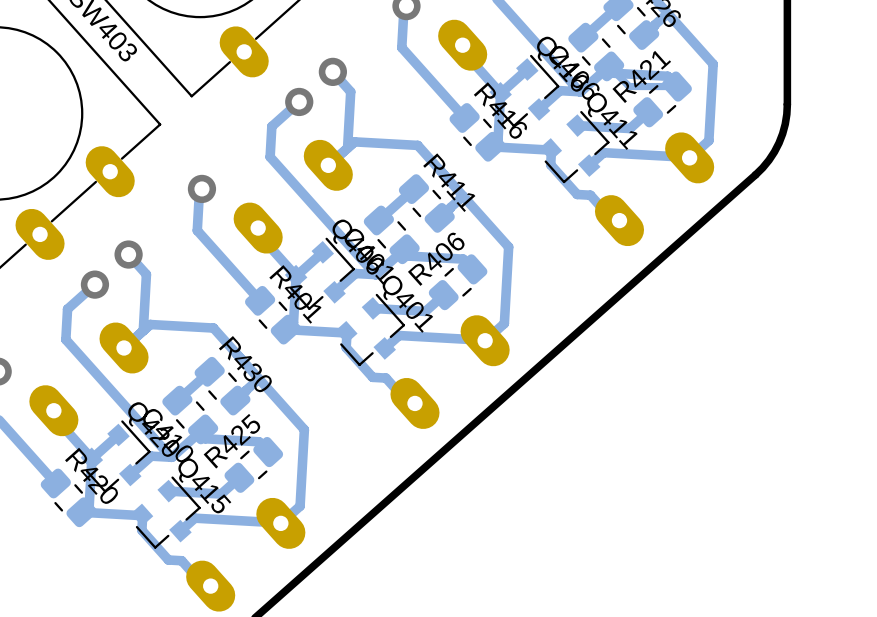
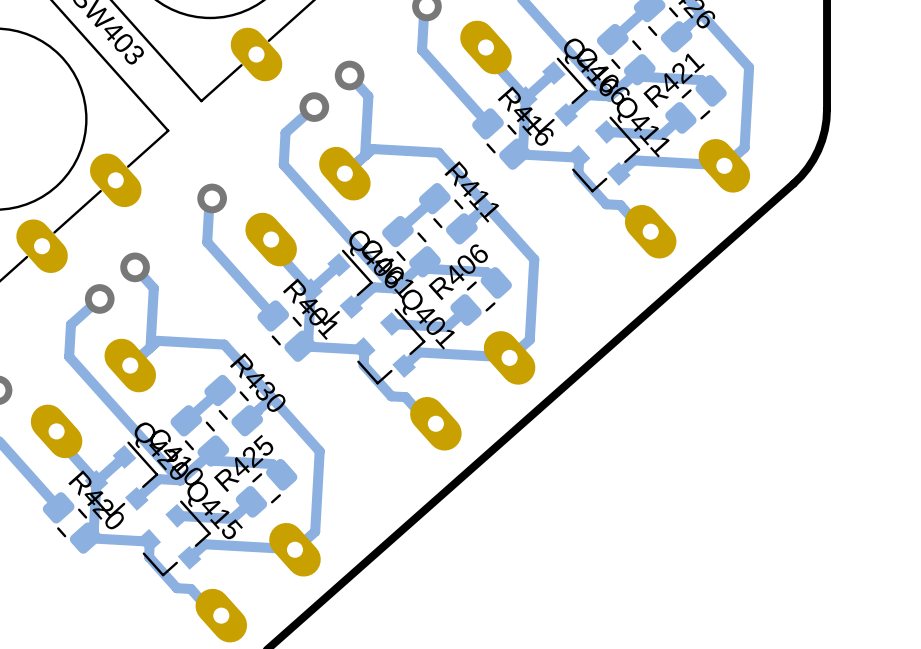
track: (609, 66) (629, 86) (676, 86) -> none

